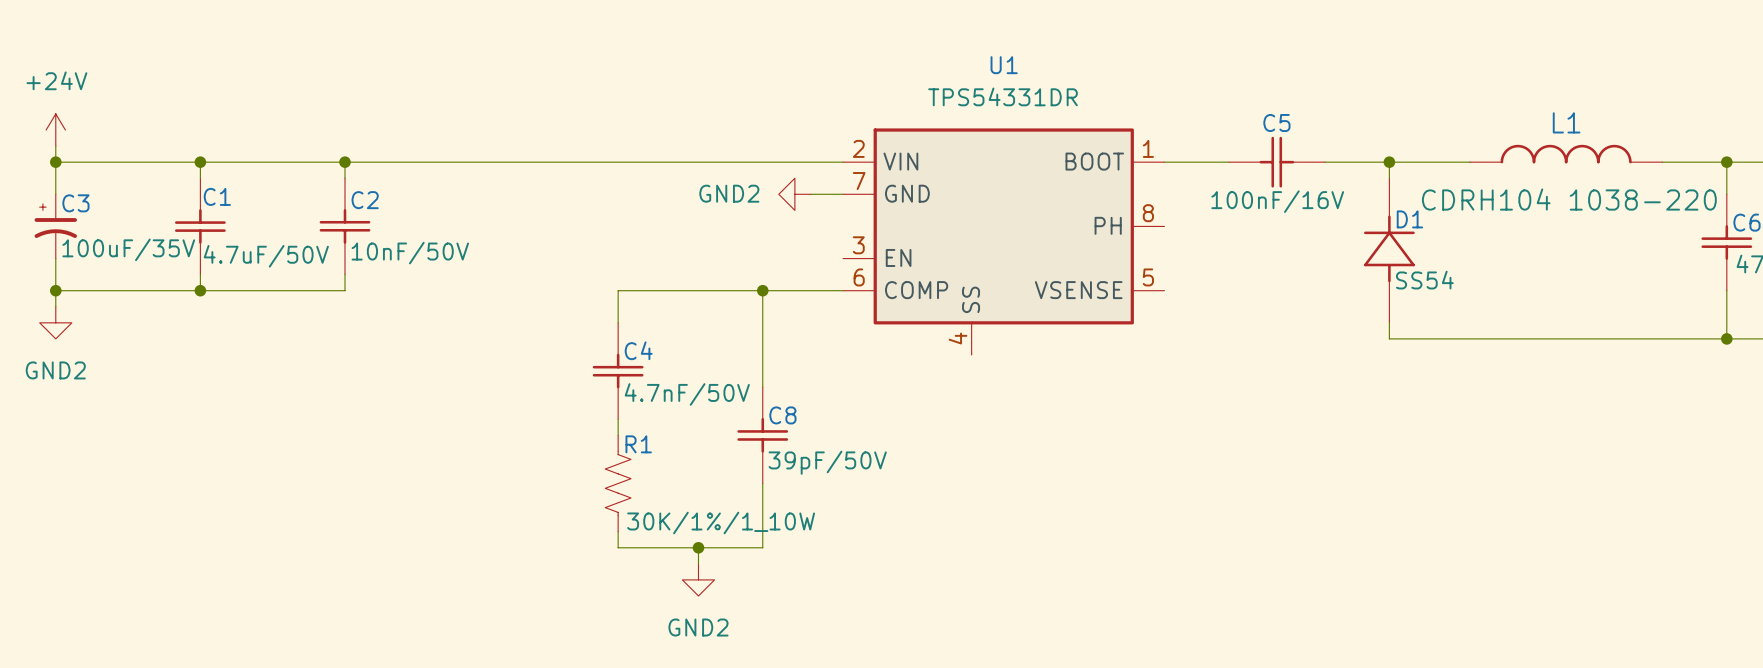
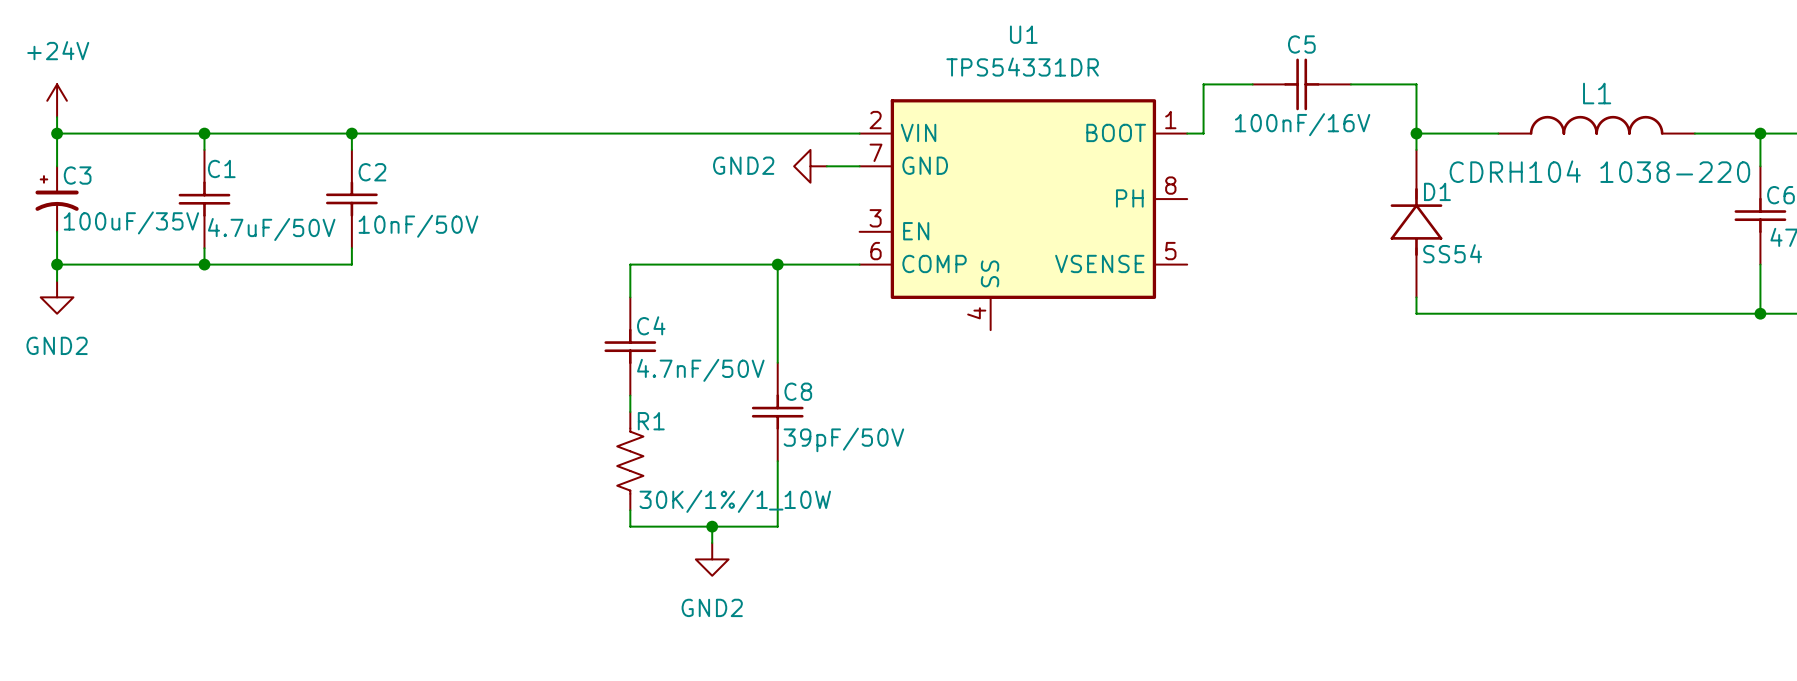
wire: (1180, 162) (1228, 162) -> (1203, 133) (1203, 84) (1252, 84)
C5 position: (1276, 162) -> (1301, 84)
wire: (1325, 162) (1389, 162) -> (1350, 84) (1416, 84) (1416, 133)

